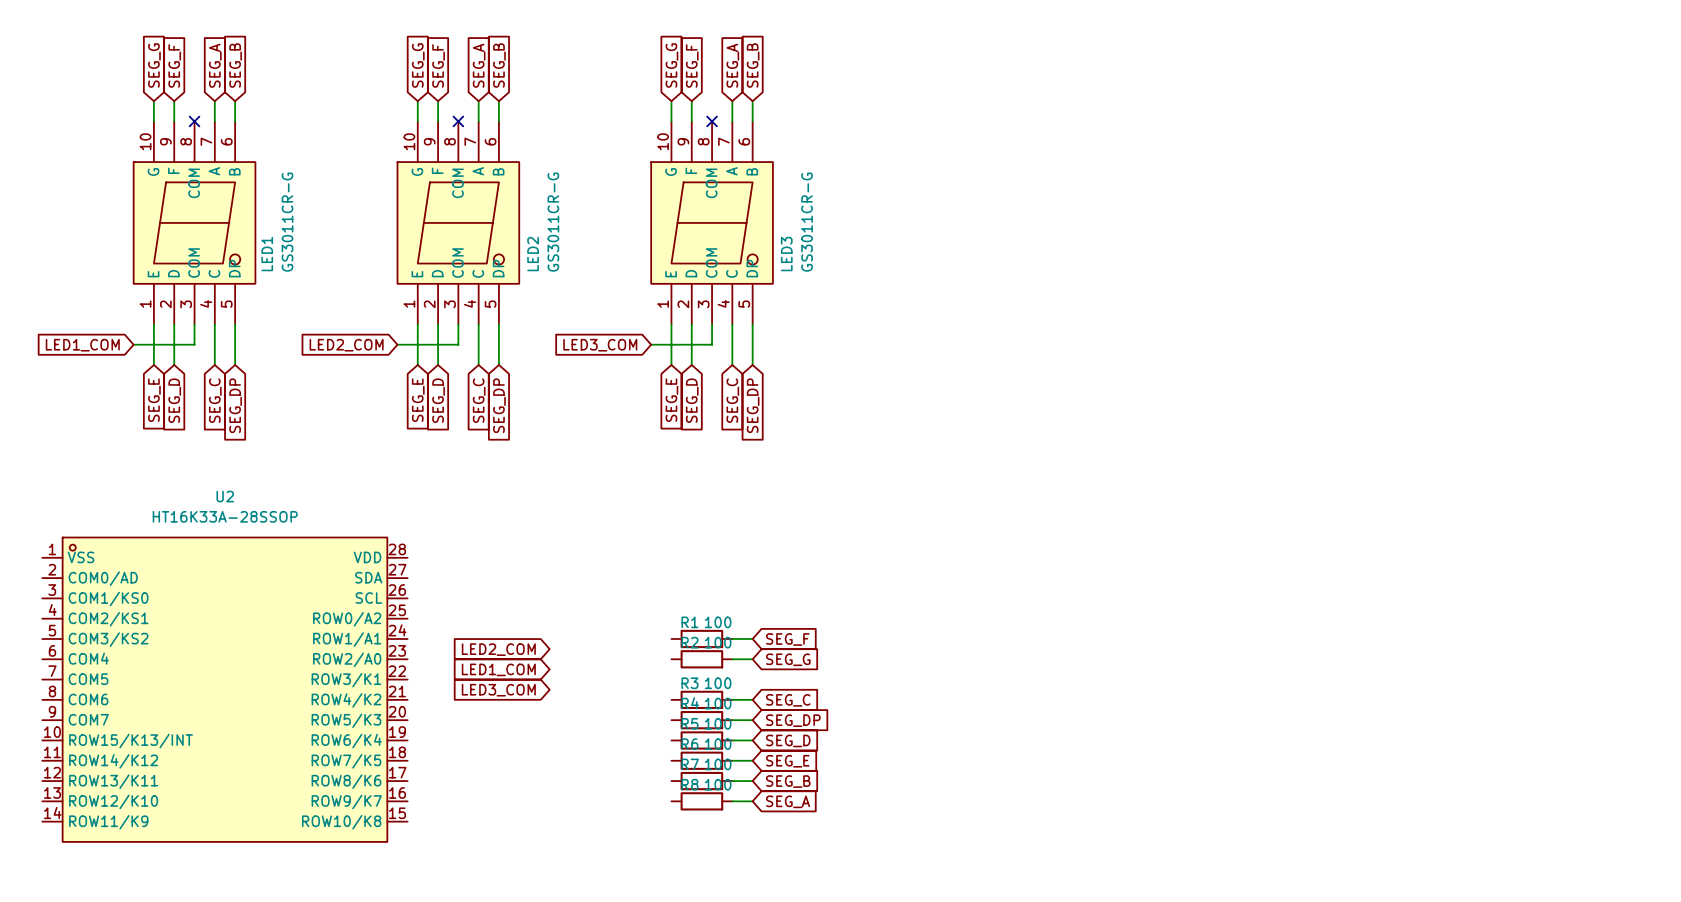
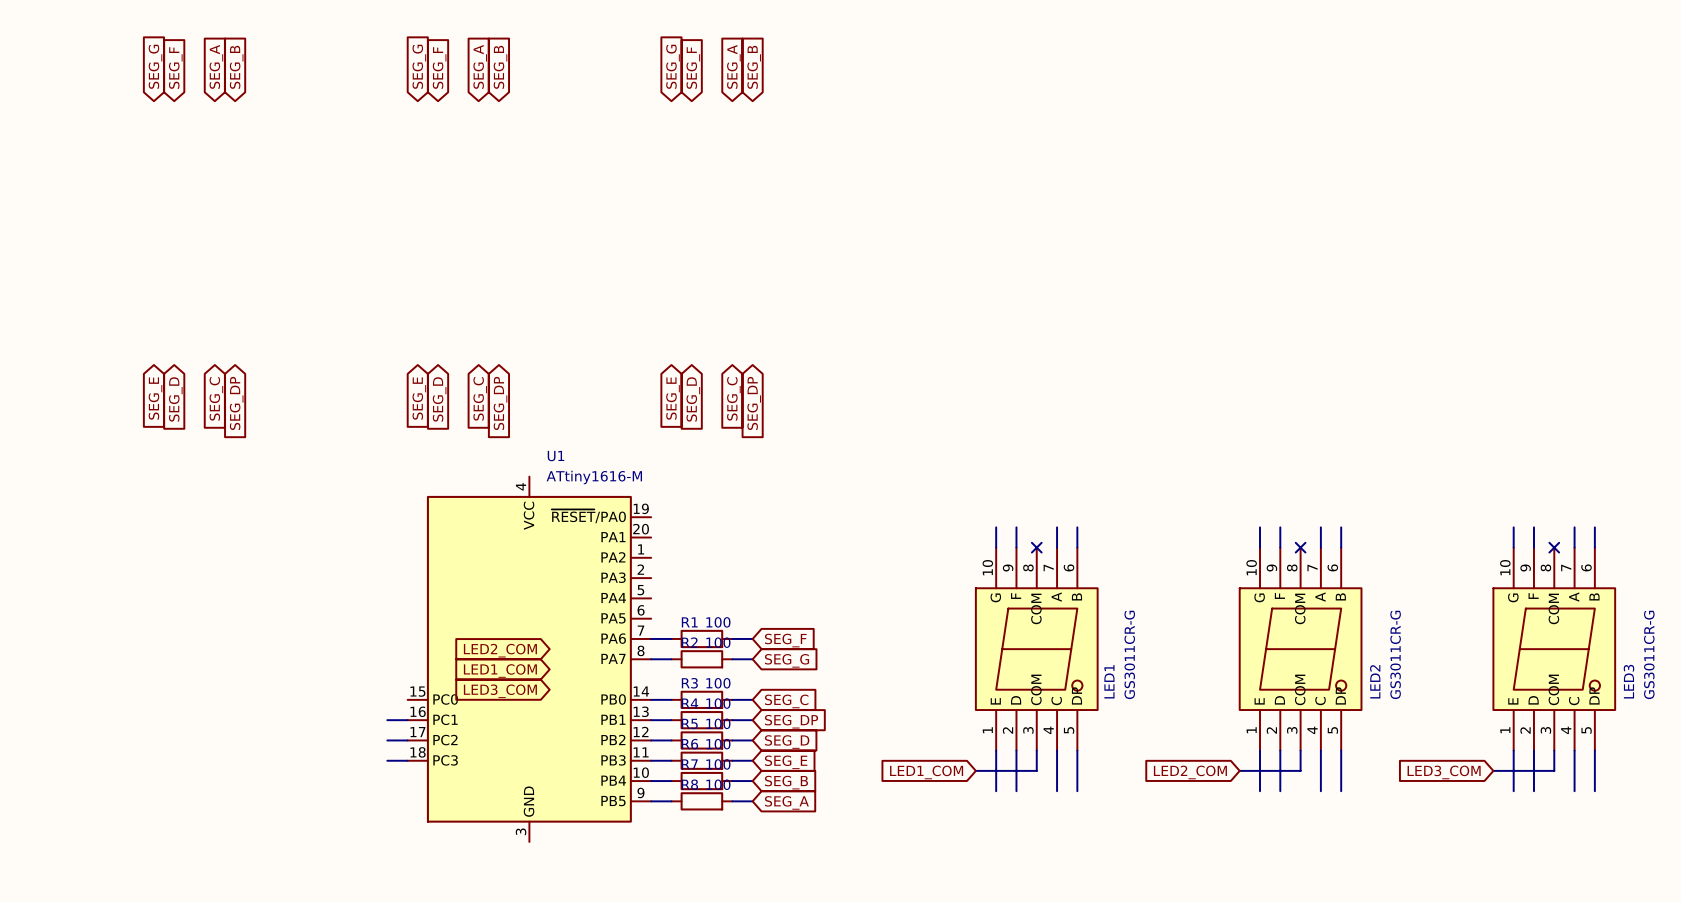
wire: (153, 101) (153, 121) -> none
wire: (174, 101) (174, 121) -> none
wire: (214, 101) (214, 121) -> none
wire: (235, 101) (235, 121) -> none
wire: (417, 101) (417, 121) -> none
wire: (438, 101) (438, 121) -> none
wire: (478, 101) (478, 121) -> none
wire: (498, 101) (498, 121) -> none
wire: (671, 101) (671, 121) -> none
wire: (691, 101) (691, 121) -> none
wire: (732, 101) (732, 121) -> none
wire: (752, 101) (752, 121) -> none
no-connect mark: (194, 121) -> none
no-connect mark: (458, 121) -> none
no-connect mark: (712, 121) -> none
LED1 position: (194, 222) -> (1036, 649)
LED2 position: (458, 222) -> (1300, 649)
LED3 position: (712, 222) -> (1554, 649)
wire: (153, 324) (153, 365) -> none
wire: (174, 324) (174, 365) -> none
wire: (194, 324) (194, 344) (133, 344) -> none
wire: (214, 324) (214, 365) -> none
wire: (235, 324) (235, 365) -> none
wire: (417, 324) (417, 365) -> none
wire: (438, 324) (438, 365) -> none
wire: (458, 324) (458, 344) (397, 344) -> none
wire: (478, 324) (478, 365) -> none
wire: (498, 324) (498, 365) -> none
wire: (671, 324) (671, 365) -> none
wire: (691, 324) (691, 365) -> none
wire: (712, 324) (712, 344) (651, 344) -> none
wire: (732, 324) (732, 365) -> none
wire: (752, 324) (752, 365) -> none
global label: LED1_COM (82, 345) -> none
global label: LED2_COM (346, 345) -> none
global label: LED3_COM (600, 345) -> none
wire: none -> (996, 527) (996, 547)
wire: none -> (1016, 527) (1016, 547)
wire: none -> (1057, 527) (1057, 547)
wire: none -> (1077, 527) (1077, 547)
wire: none -> (1260, 527) (1260, 547)
wire: none -> (1280, 527) (1280, 547)
wire: none -> (1320, 527) (1320, 547)
wire: none -> (1341, 527) (1341, 547)
wire: none -> (1513, 527) (1513, 547)
wire: none -> (1533, 527) (1533, 547)
wire: none -> (1574, 527) (1574, 547)
wire: none -> (1594, 527) (1594, 547)
no-connect mark: none -> (1036, 547)
no-connect mark: none -> (1300, 547)
no-connect mark: none -> (1554, 547)
wire: none -> (651, 638) (671, 638)
U1: none -> ATtiny1616-M (529, 659)
wire: none -> (651, 659) (671, 659)
U2: HT16K33A-28SSOP (224, 689) -> none
wire: none -> (651, 699) (671, 699)
wire: none -> (651, 720) (671, 720)
wire: none -> (651, 740) (671, 740)
wire: none -> (996, 750) (996, 791)
wire: none -> (1016, 750) (1016, 791)
wire: none -> (1036, 750) (1036, 770) (975, 770)
wire: none -> (1057, 750) (1057, 791)
wire: none -> (1077, 750) (1077, 791)
wire: none -> (1260, 750) (1260, 791)
wire: none -> (1280, 750) (1280, 791)
wire: none -> (1300, 750) (1300, 770) (1239, 770)
wire: none -> (1320, 750) (1320, 791)
wire: none -> (1341, 750) (1341, 791)
wire: none -> (1513, 750) (1513, 791)
wire: none -> (1533, 750) (1533, 791)
wire: none -> (1554, 750) (1554, 770) (1493, 770)
wire: none -> (1574, 750) (1574, 791)
wire: none -> (1594, 750) (1594, 791)
wire: none -> (651, 760) (671, 760)
global label: none -> LED1_COM (926, 772)
global label: none -> LED2_COM (1190, 772)
global label: none -> LED3_COM (1444, 772)
wire: none -> (651, 781) (671, 781)
wire: none -> (651, 801) (671, 801)

